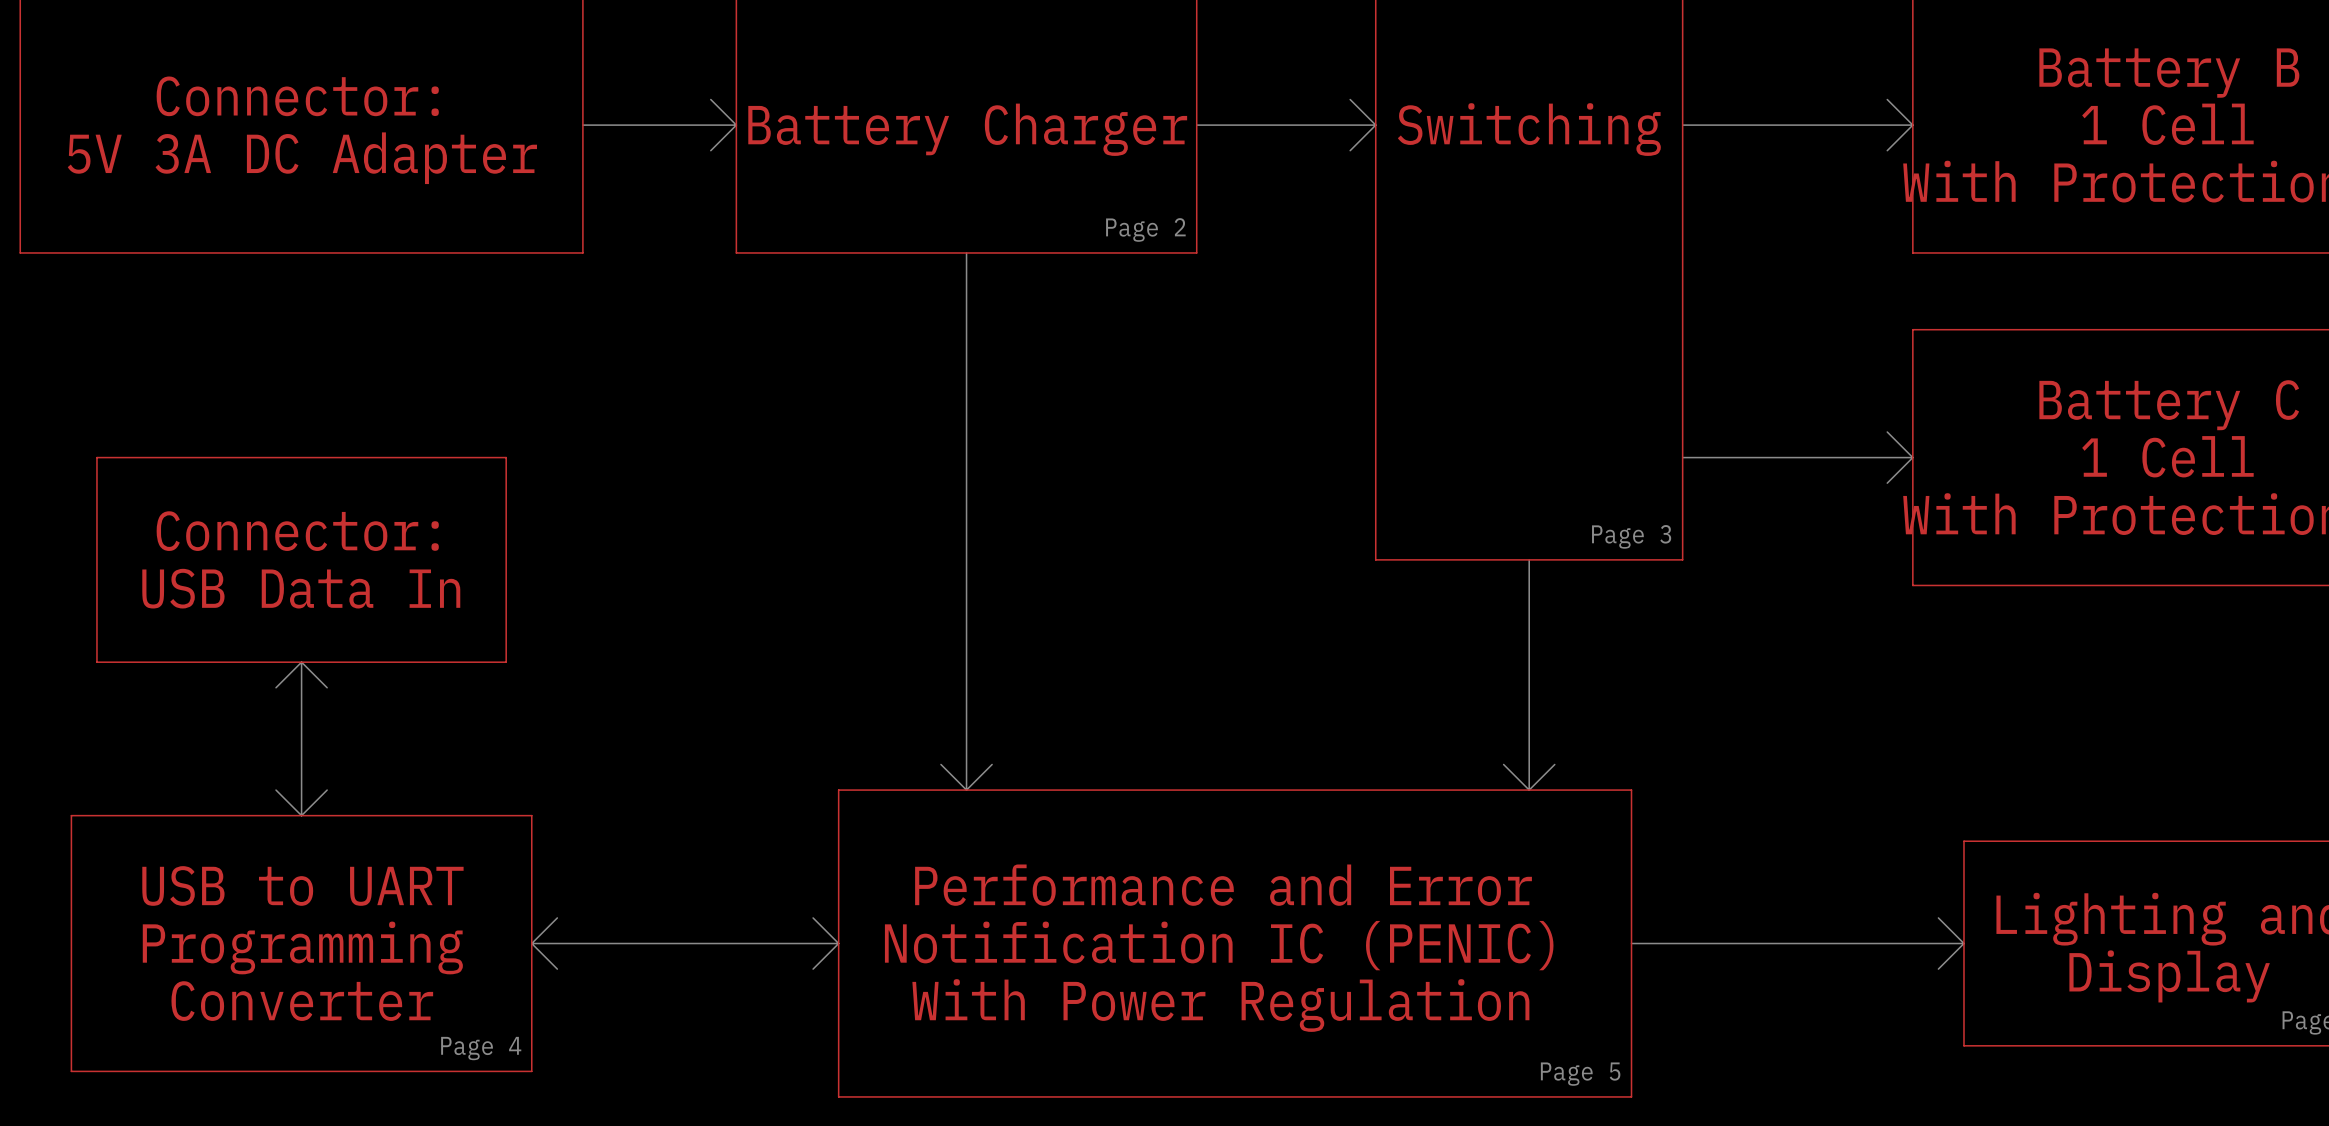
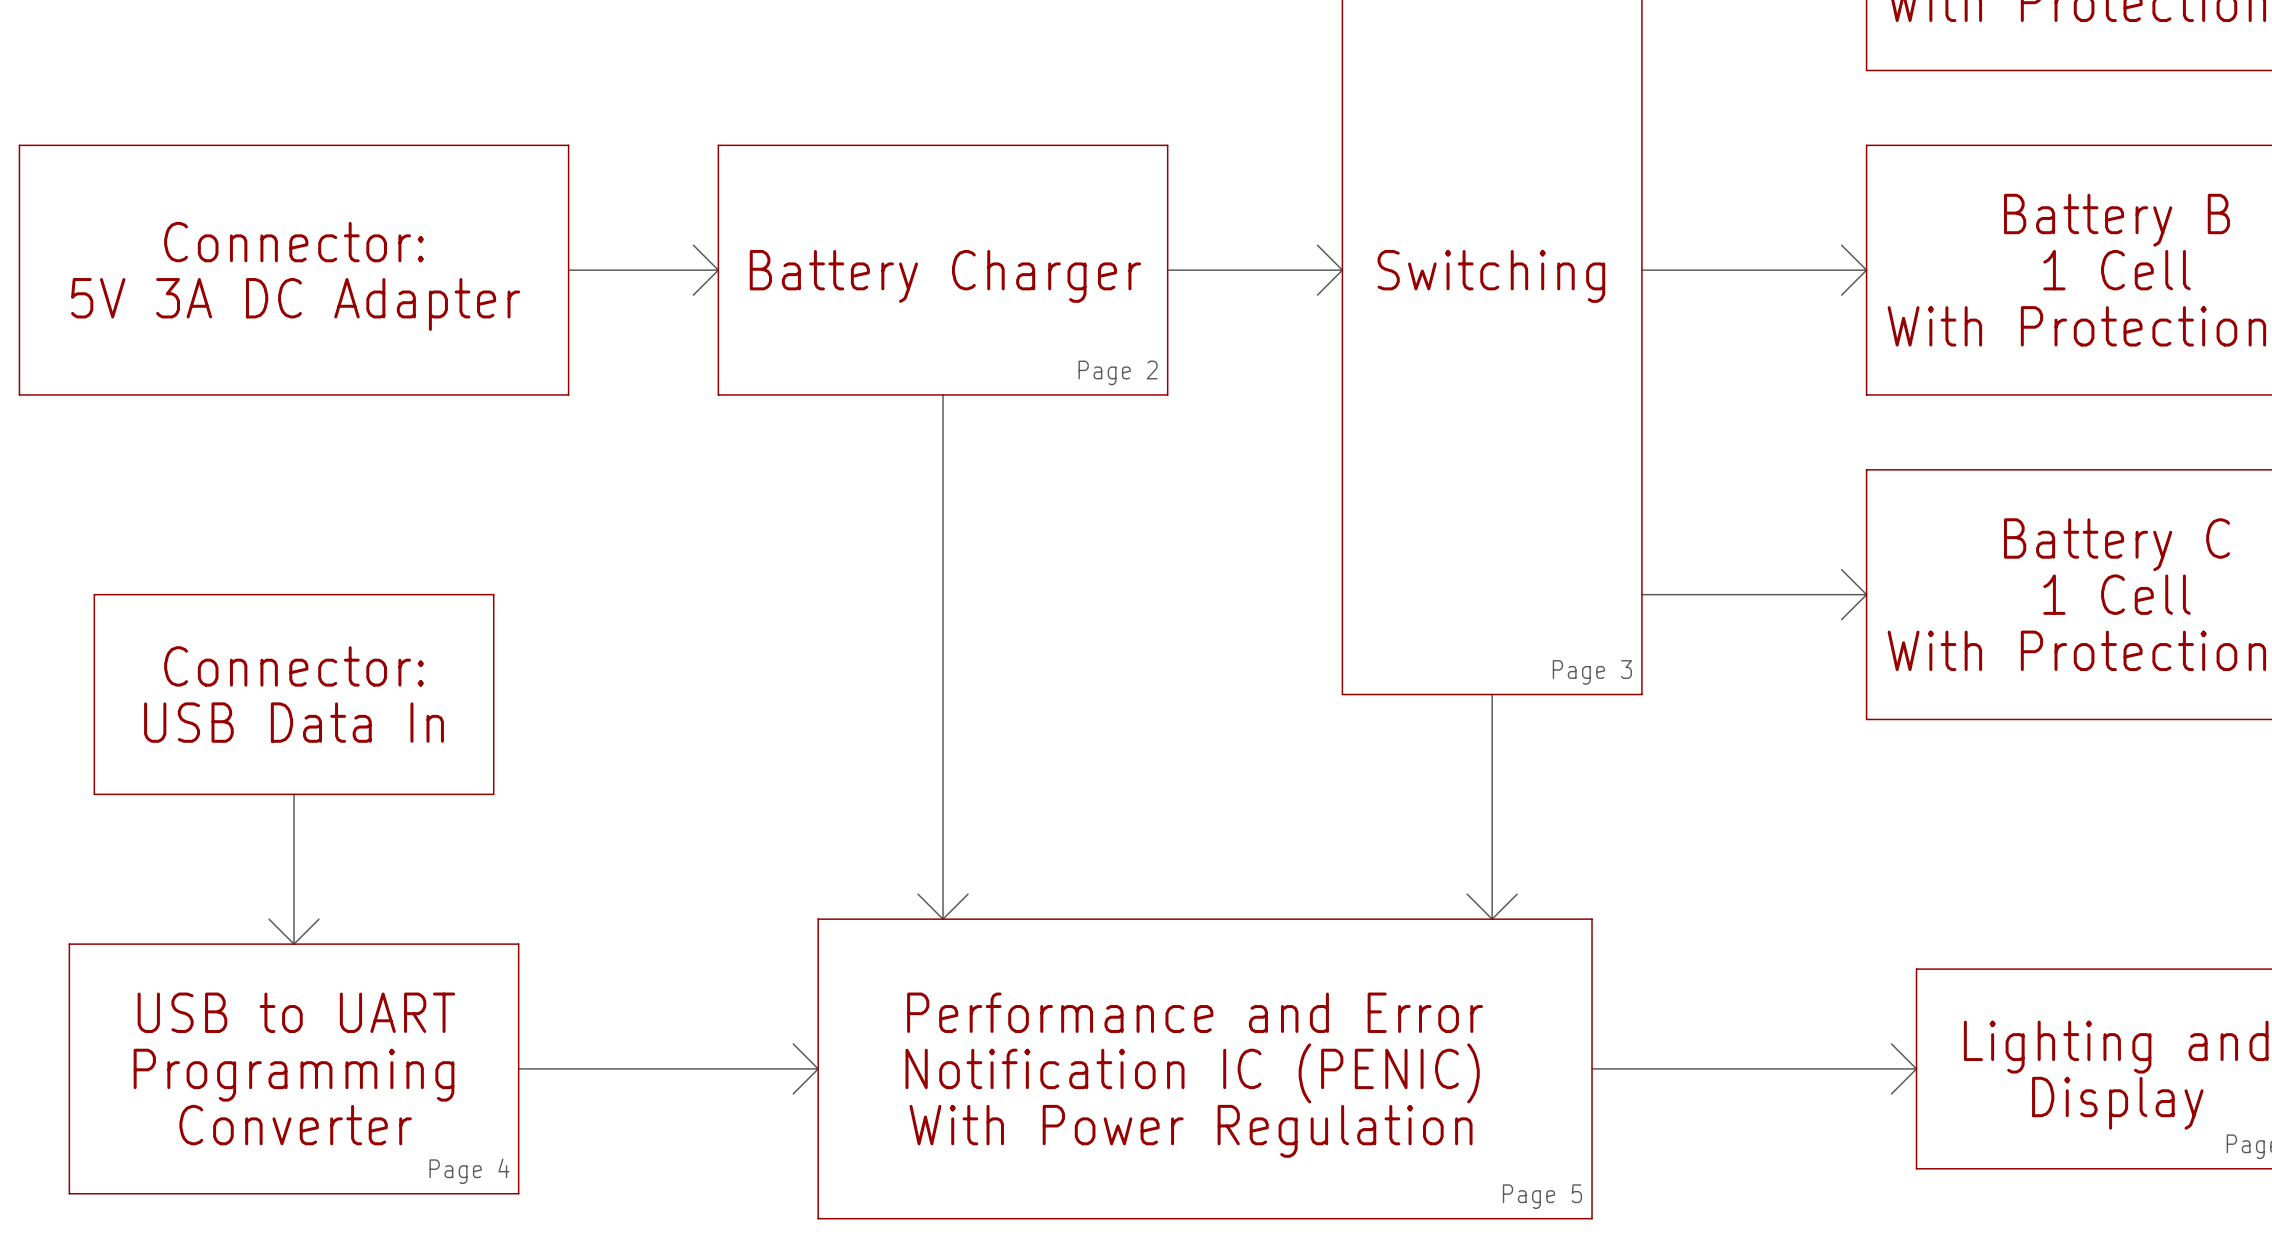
line: (276, 687) (301, 662) (327, 687) -> none
line: (557, 917) (531, 943) (557, 969) -> none

